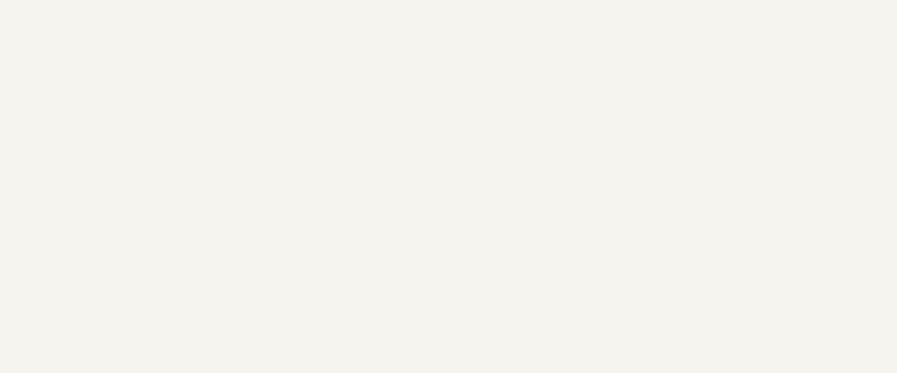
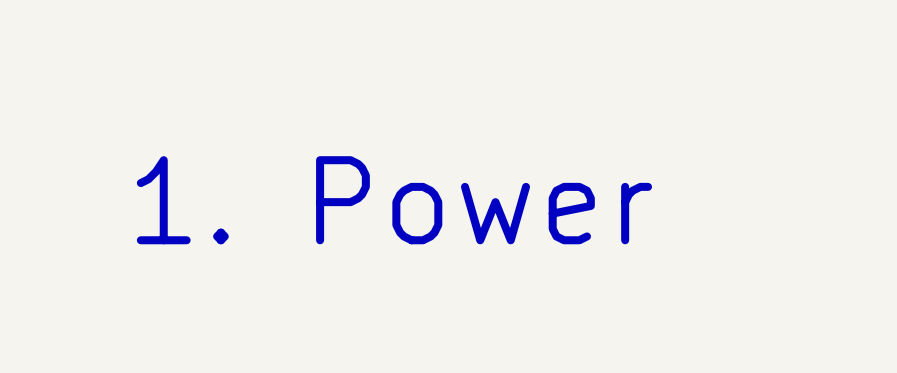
text: none -> 1. Power (394, 200)

